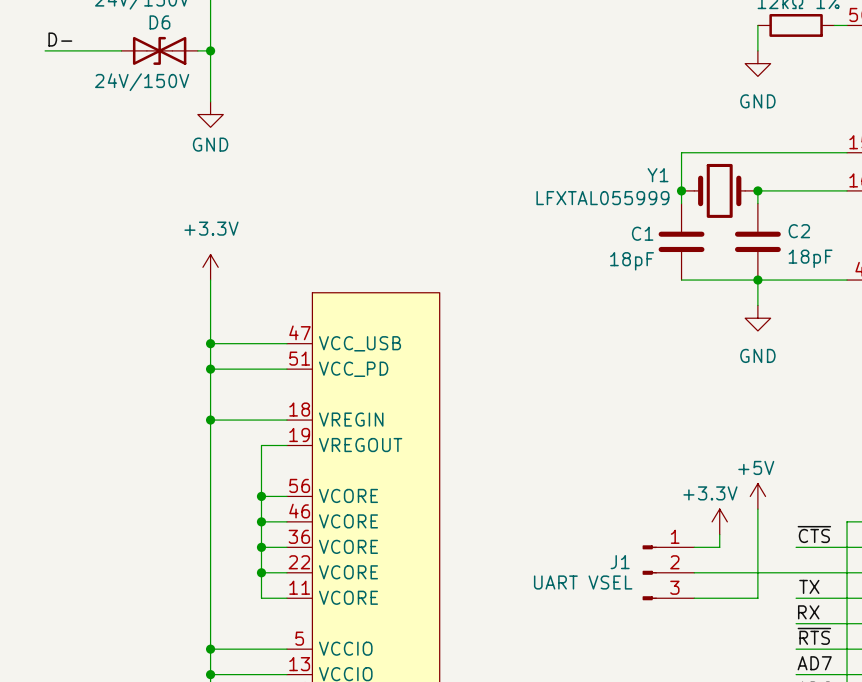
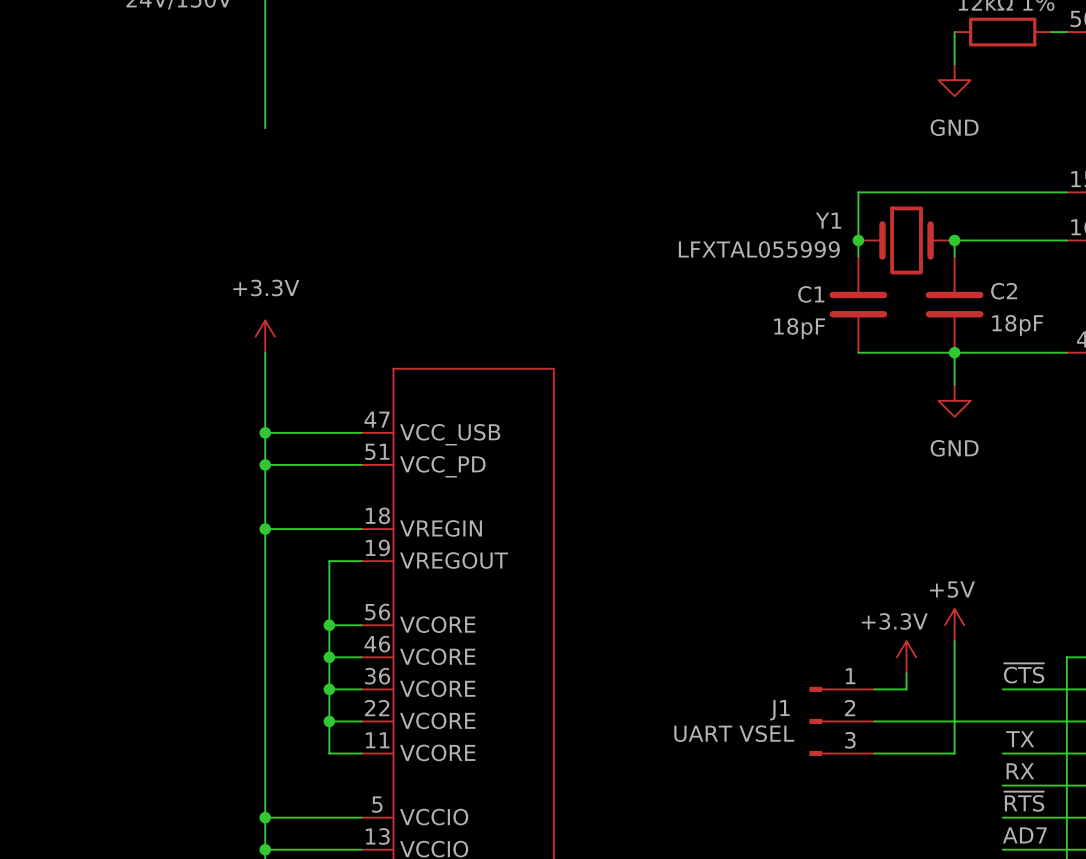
label: D- (60, 39) -> none
wire: (45, 50) (121, 50) -> none
D6: 24V/150V (159, 50) -> none
wire: (197, 50) (210, 50) -> none
junction: (210, 50) -> none
power symbol: GND (210, 114) -> none

